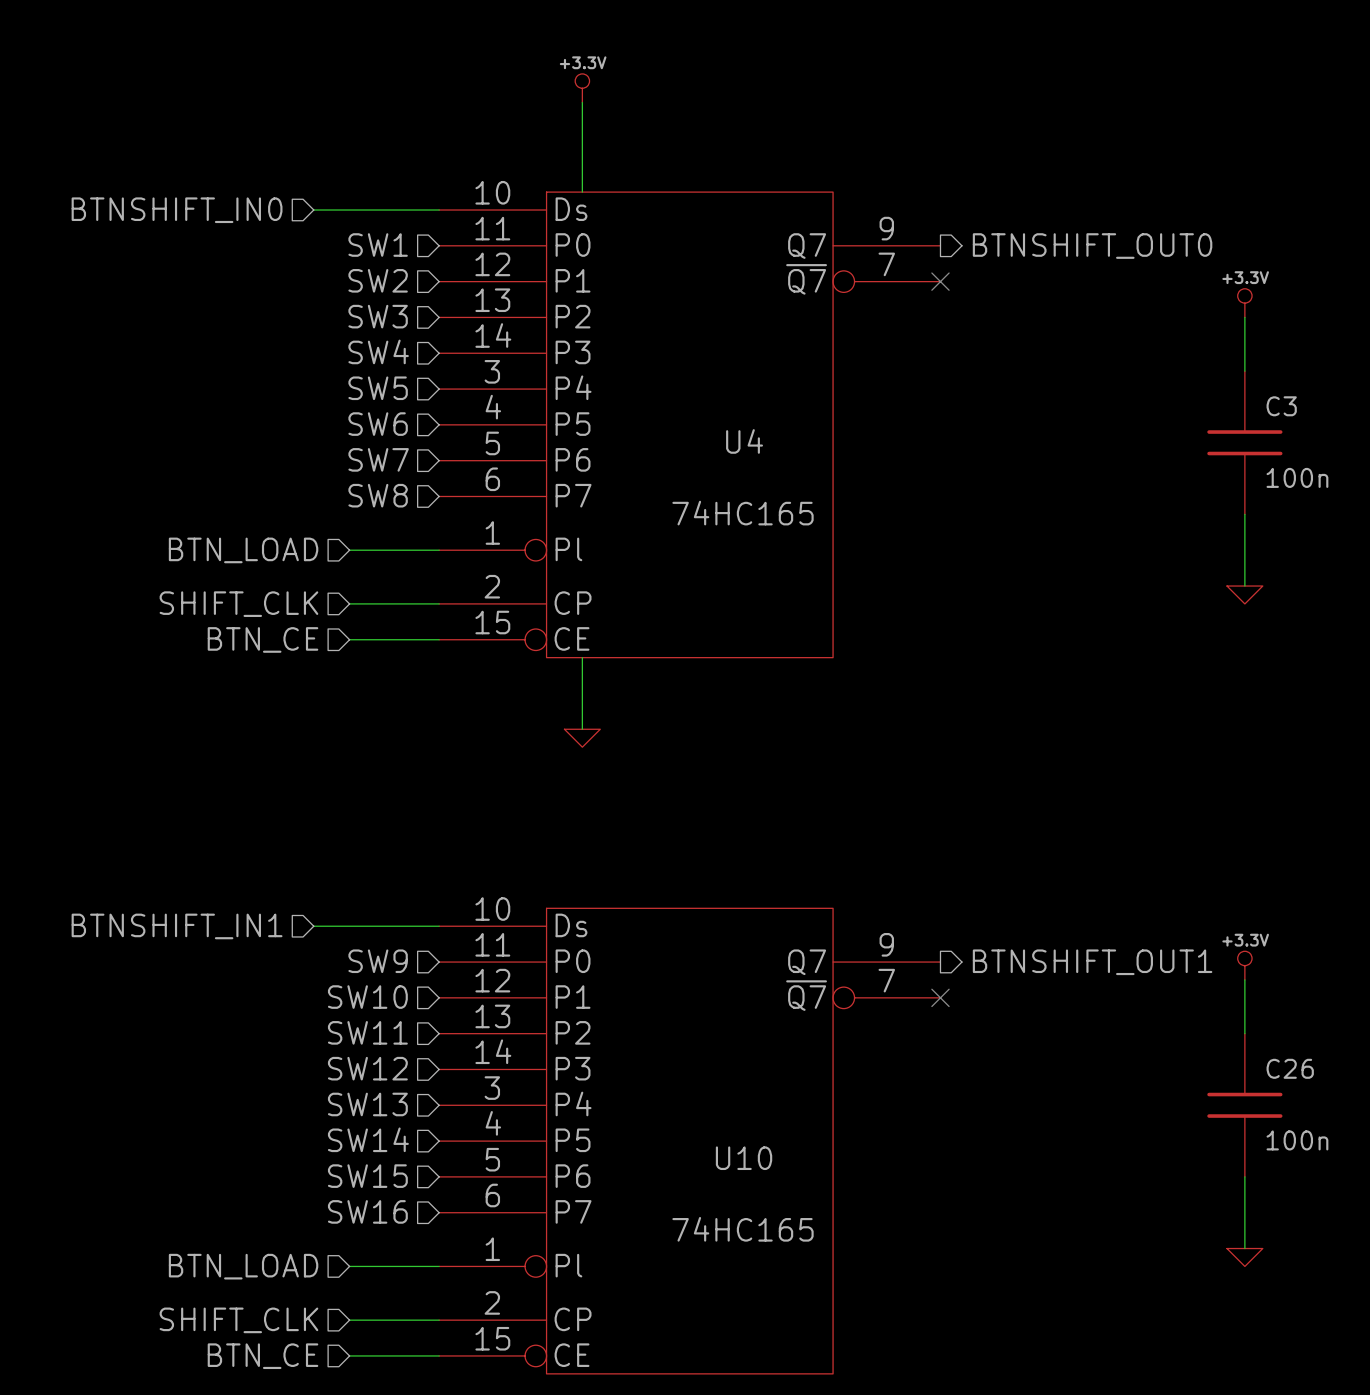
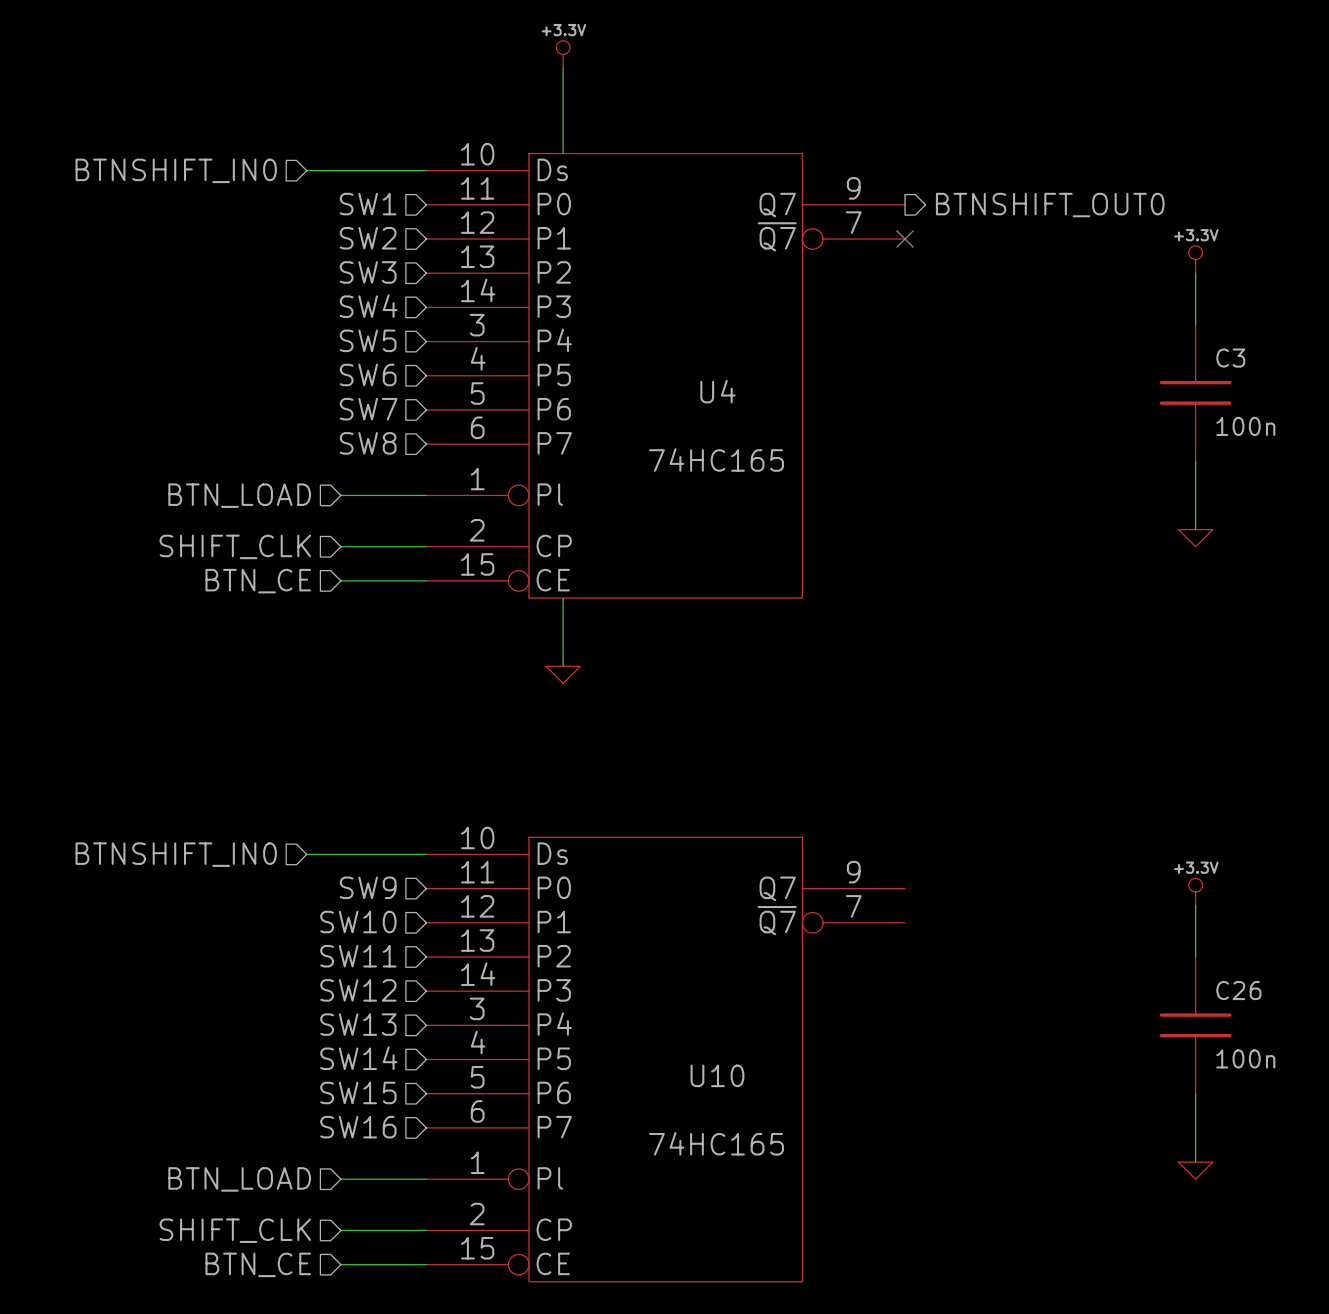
hierarchical label: BTNSHIFT_IN1 (177, 926) -> BTNSHIFT_IN0 (176, 854)
hierarchical label: BTNSHIFT_OUT1 (1092, 962) -> none
no-connect mark: (940, 997) -> none

